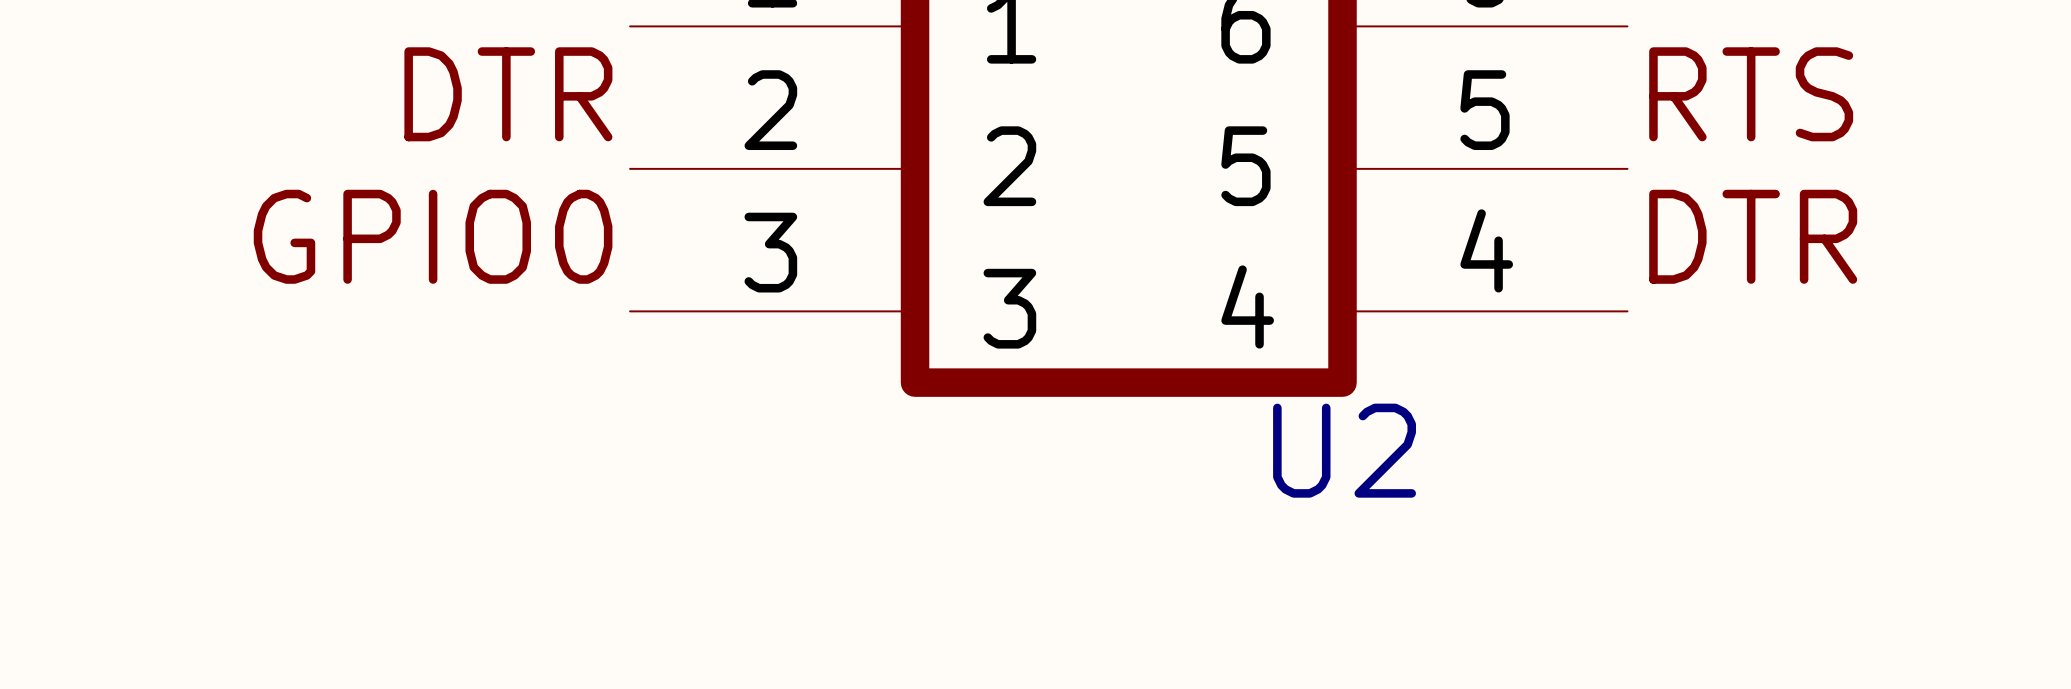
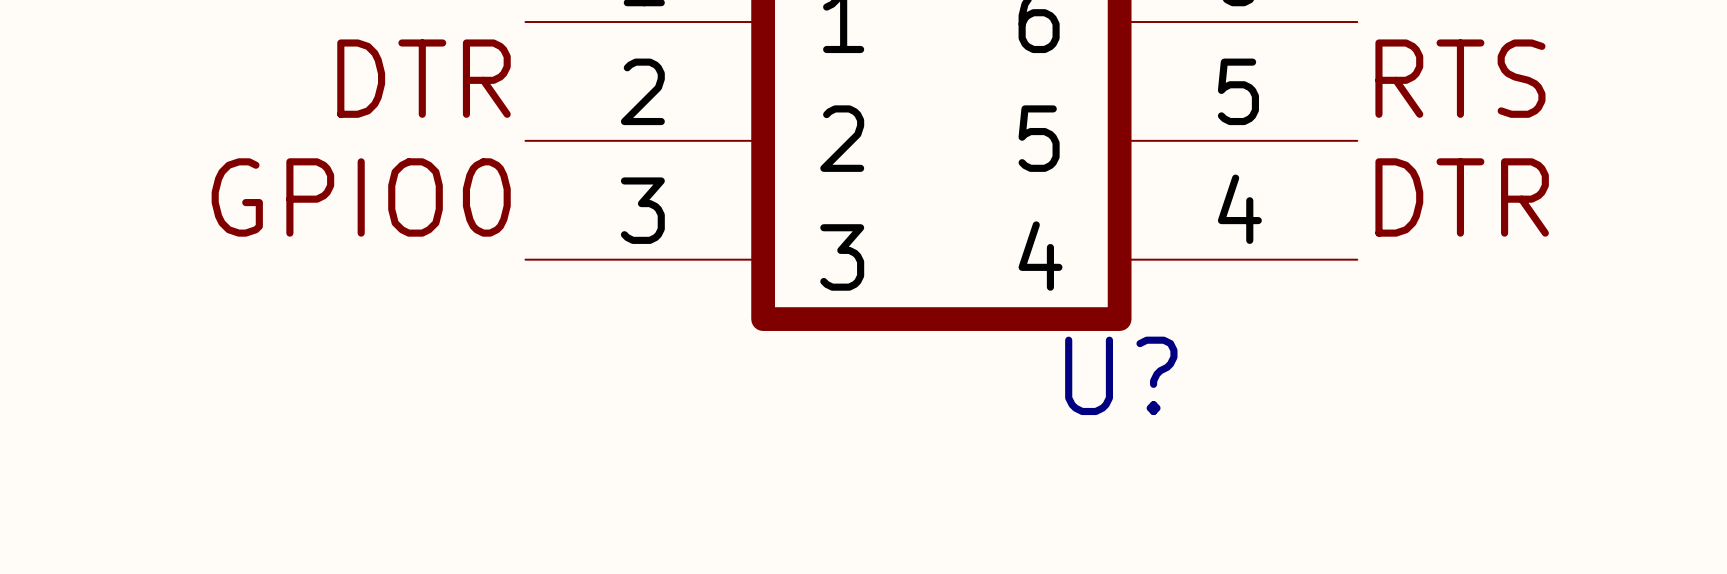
U2 name: U2 (1344, 450) -> U? (1121, 375)

